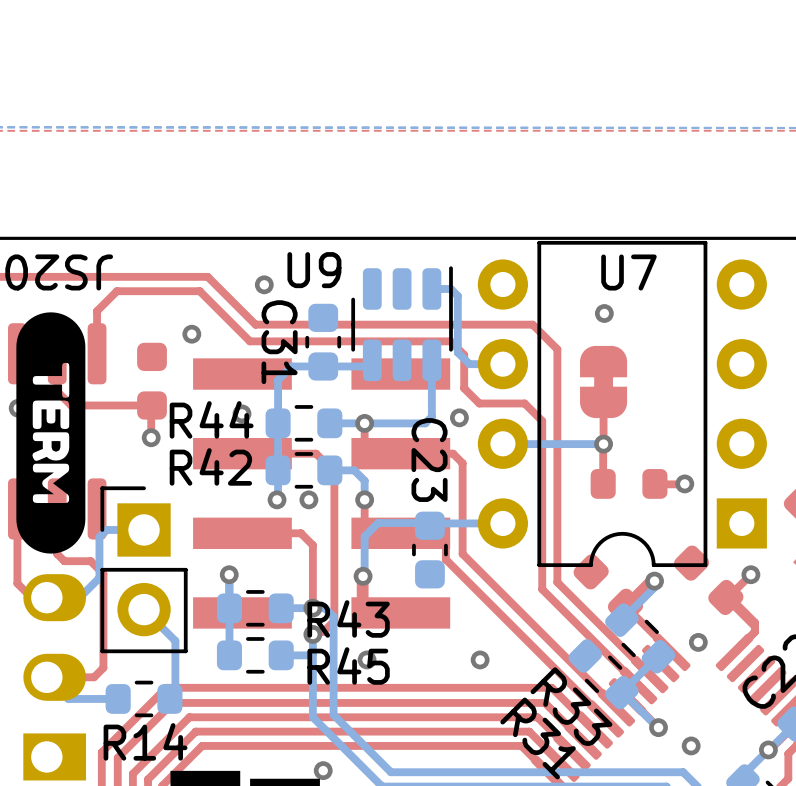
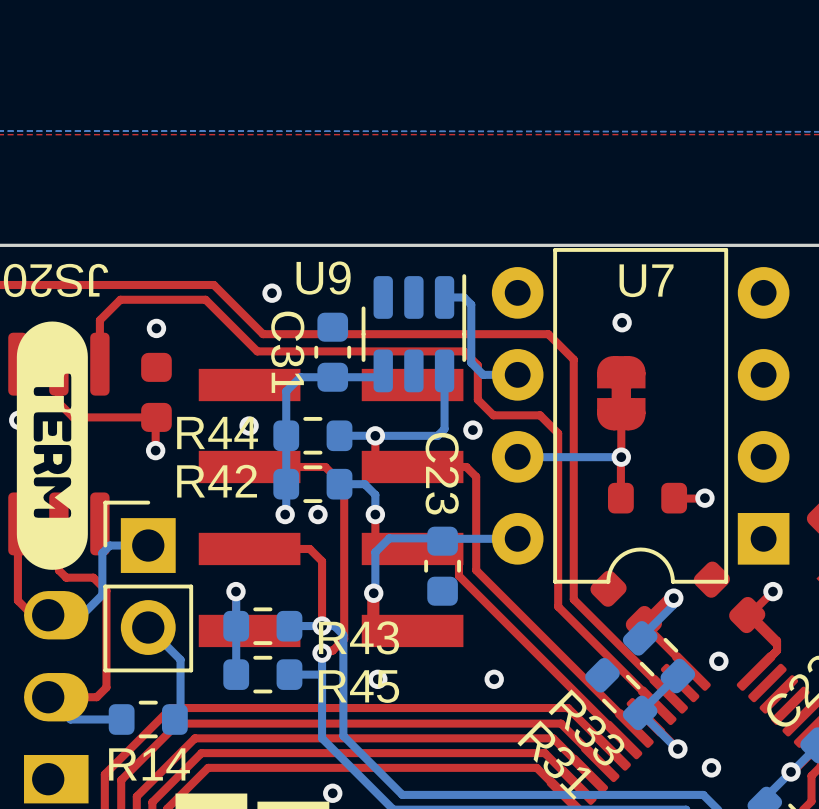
via position: (191, 334) -> (156, 328)

